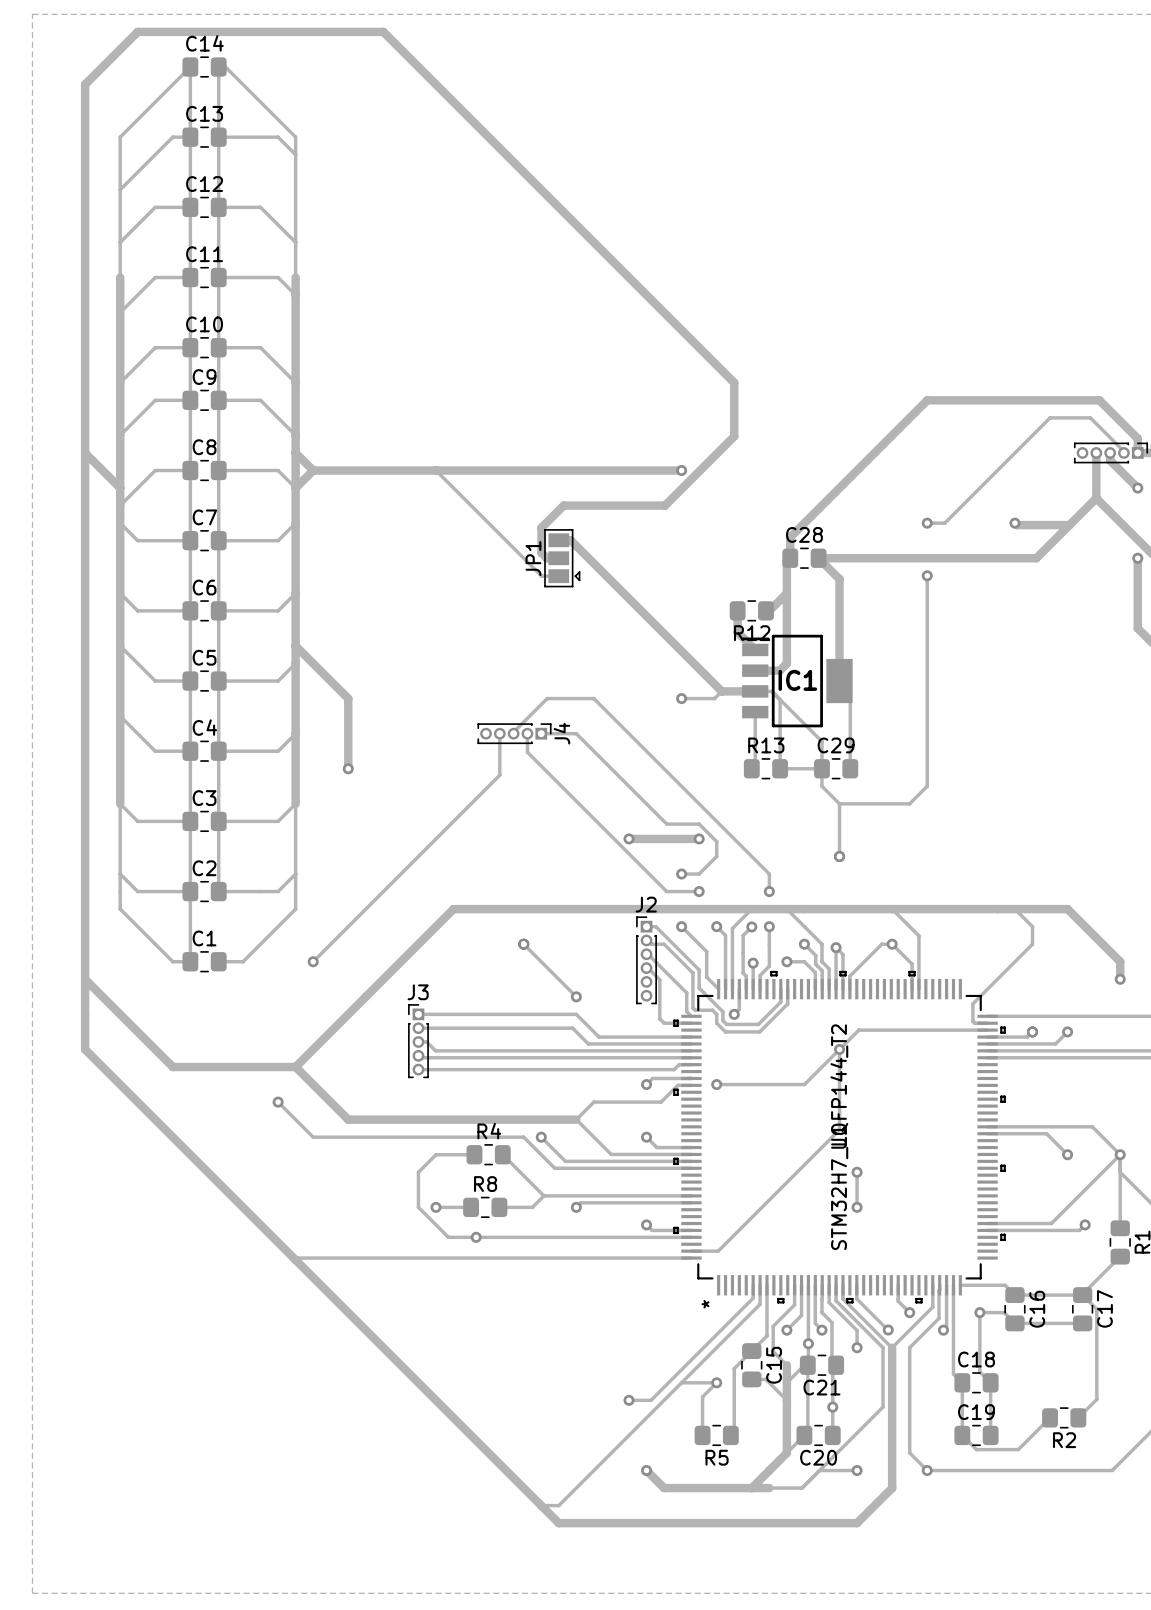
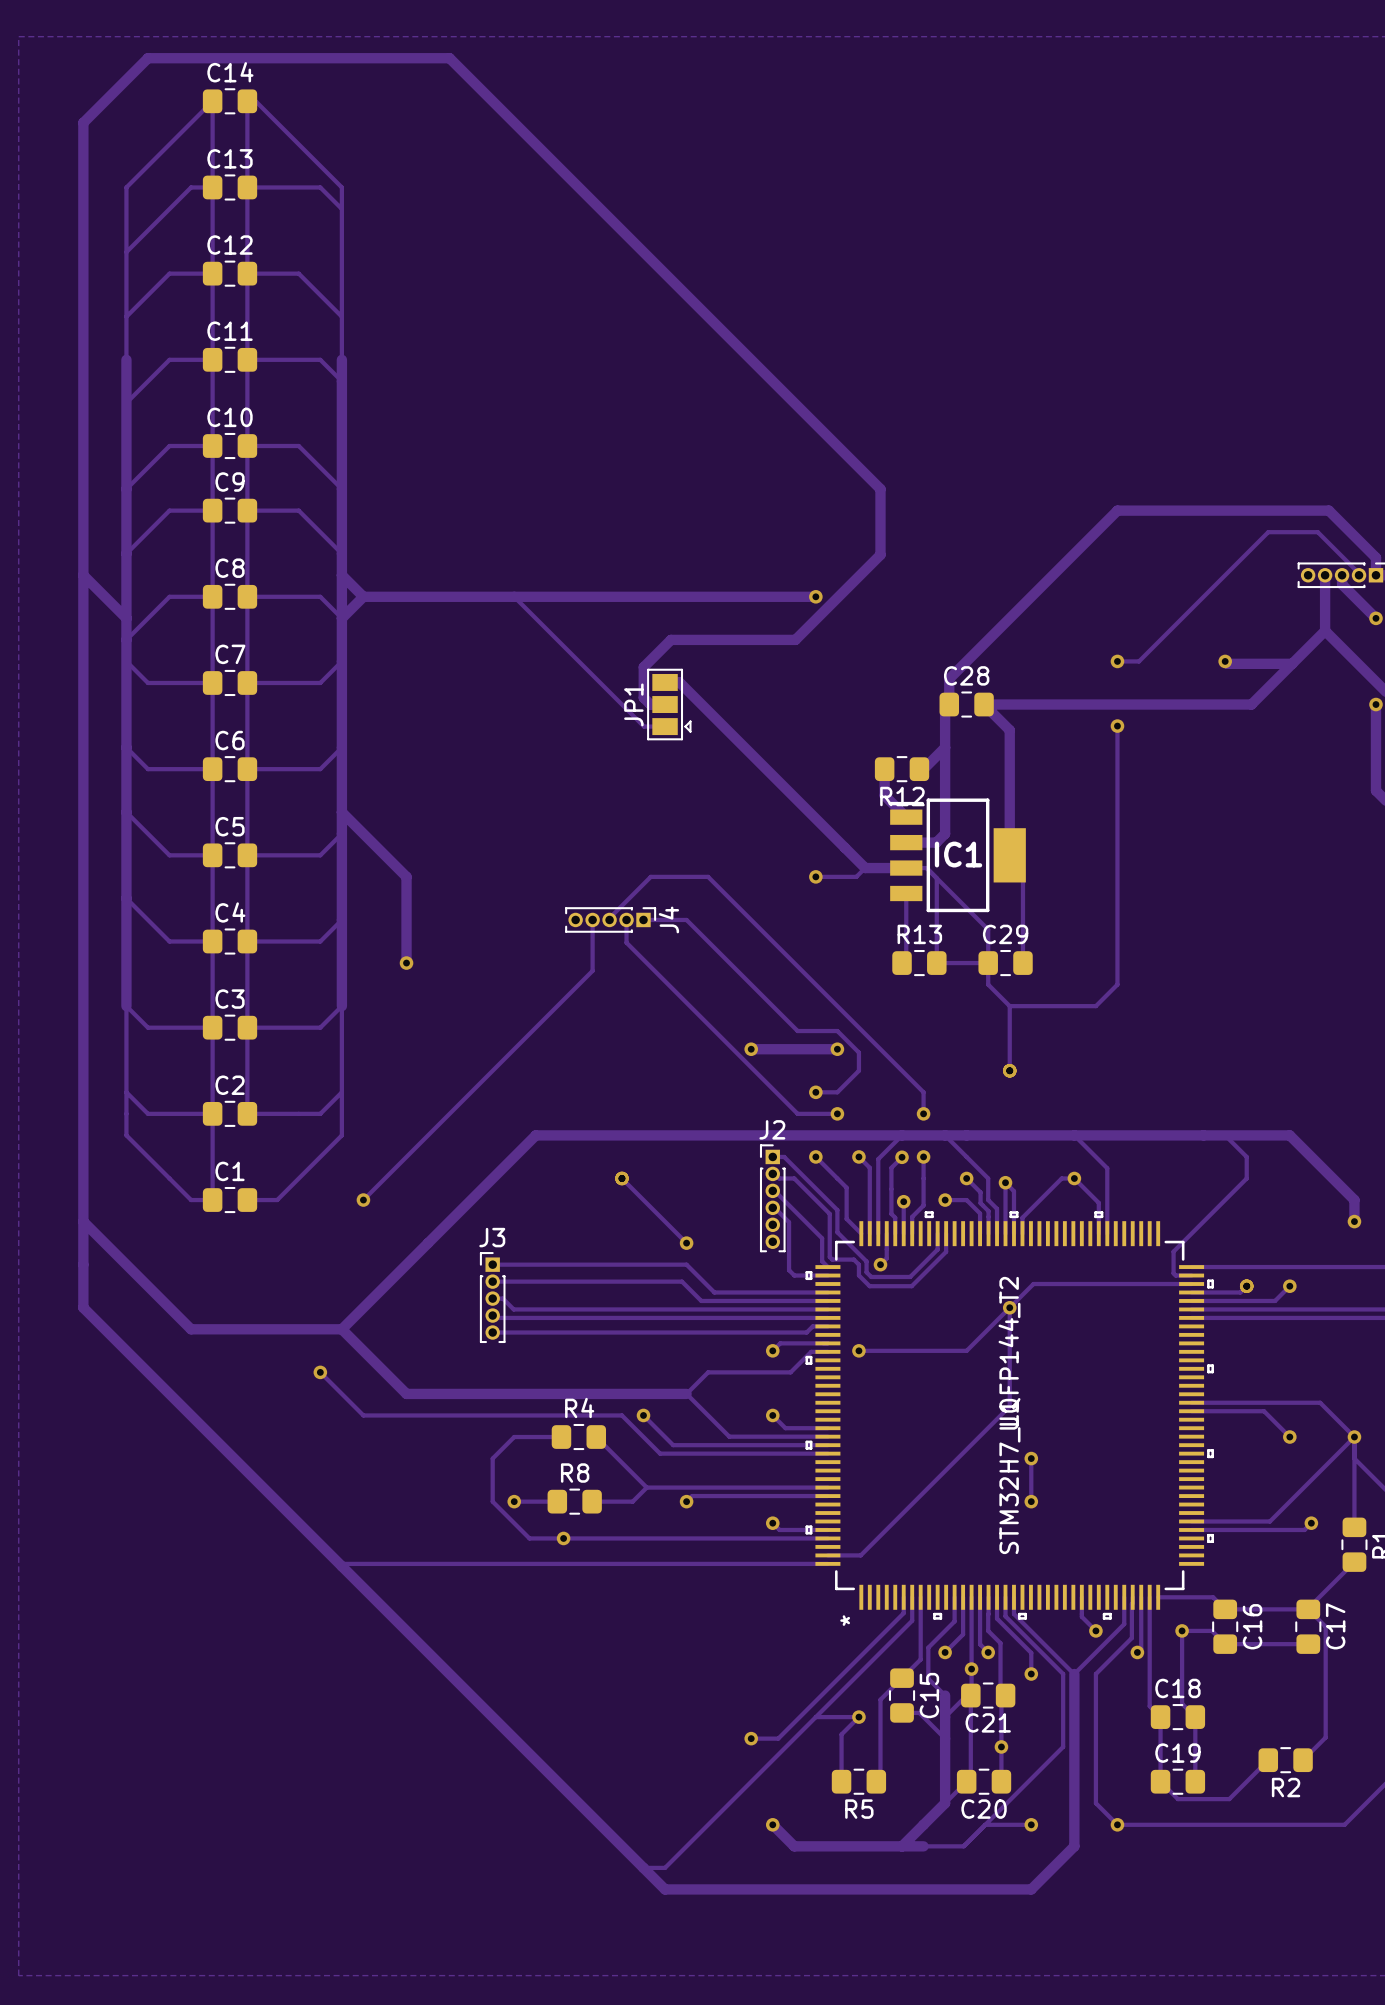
track: (856, 1285) (856, 1298) (888, 1330) -> none
via: (888, 1329) -> none

